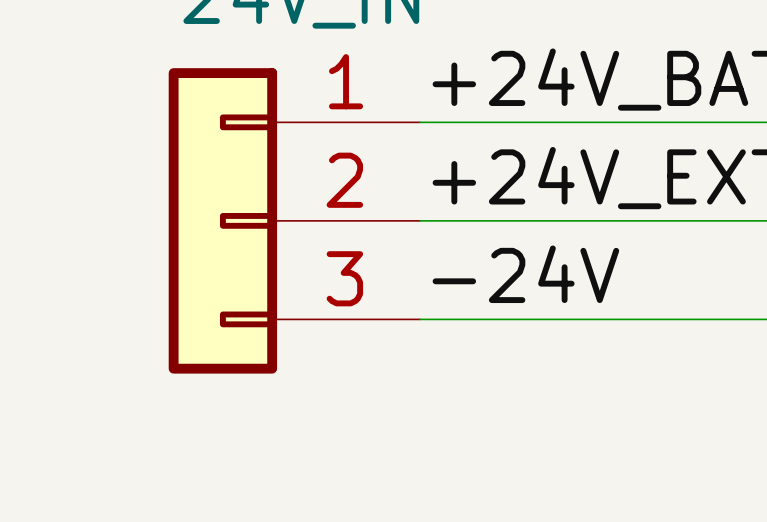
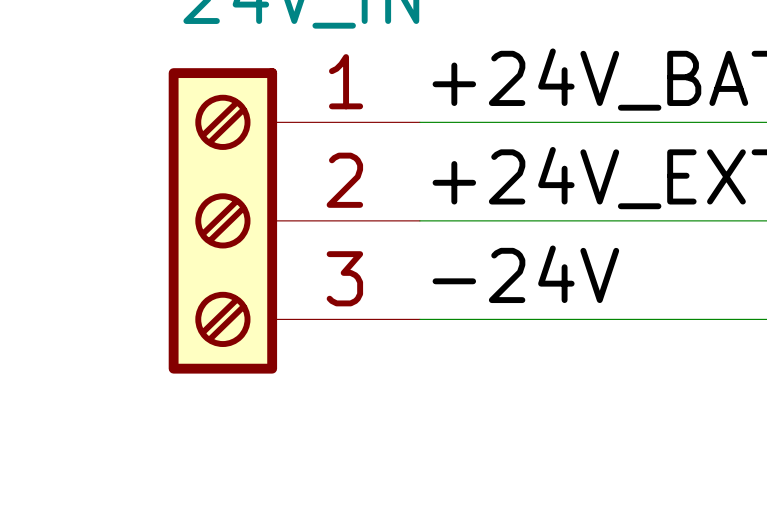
part symbol: [168, 68, 420, 374] -> [168, 68, 420, 374]

